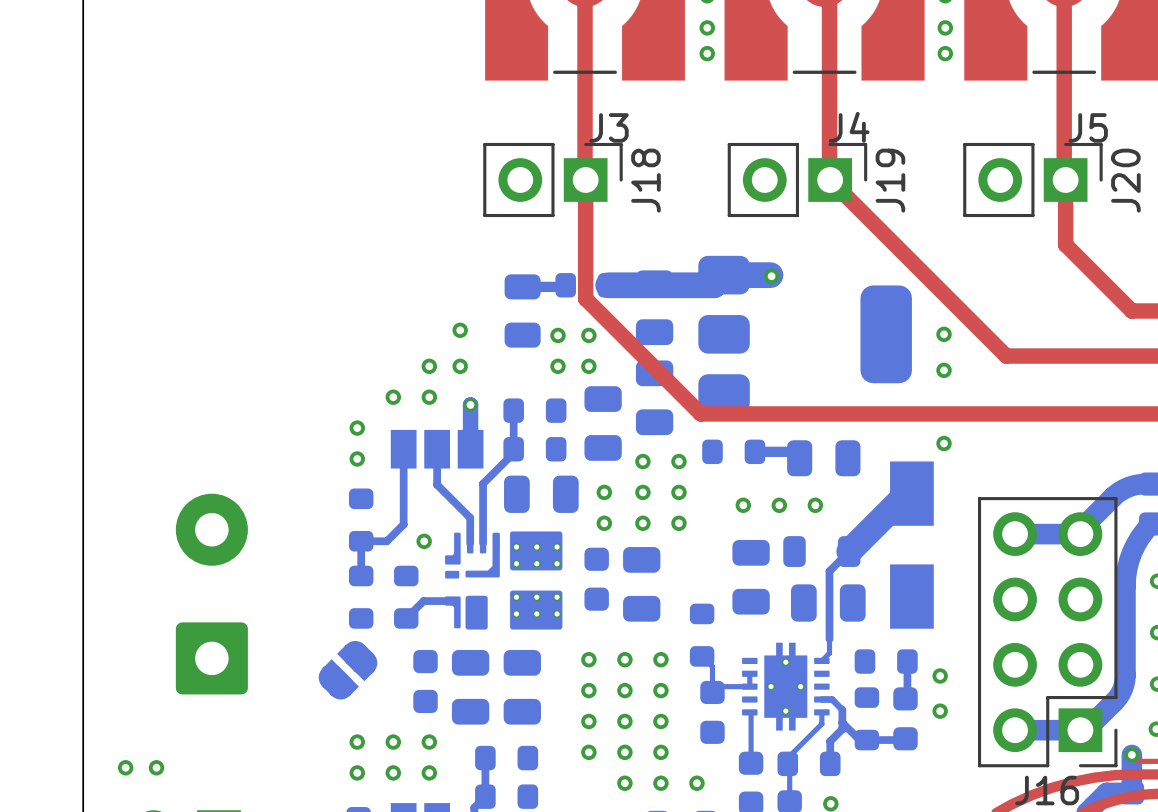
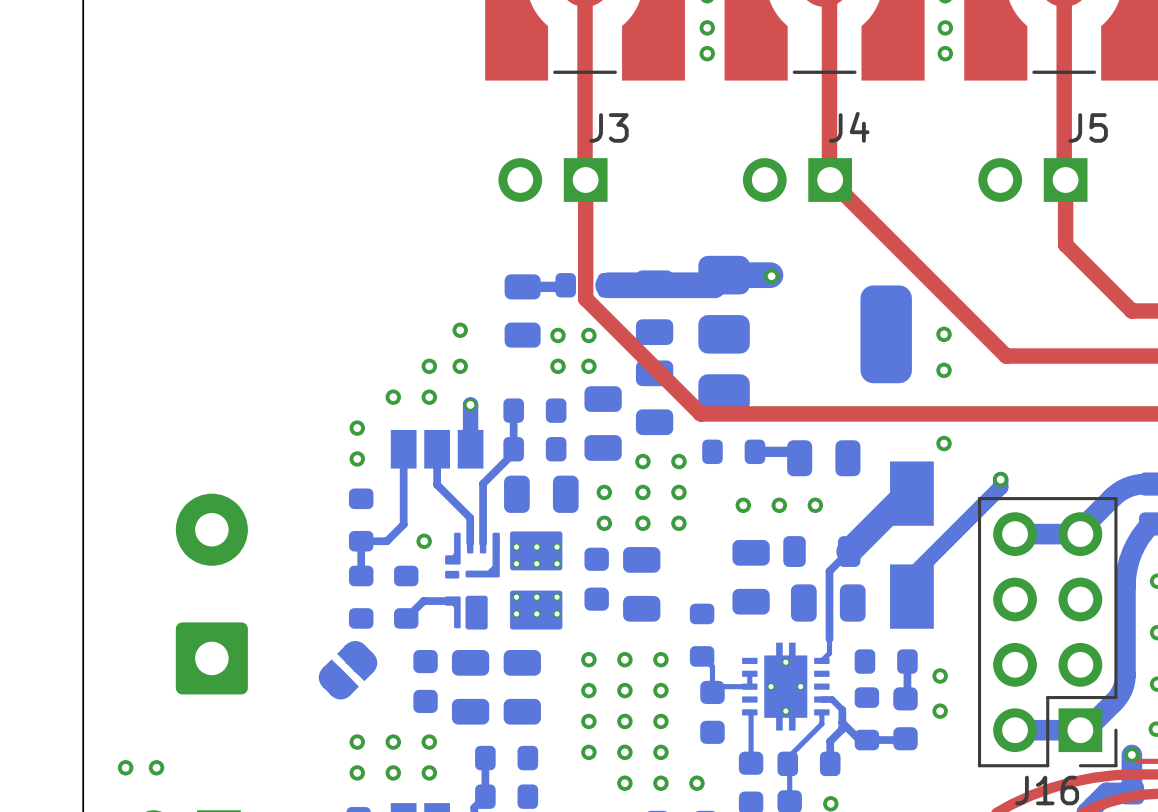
J18 side: top (552, 180) -> bottom (552, 180)
J19 side: top (797, 180) -> bottom (797, 180)
J20 side: top (1032, 180) -> bottom (1032, 180)
bottom track: none -> (1000, 479) (1000, 487) (911, 575) (911, 596)
via: none -> (1000, 479)

